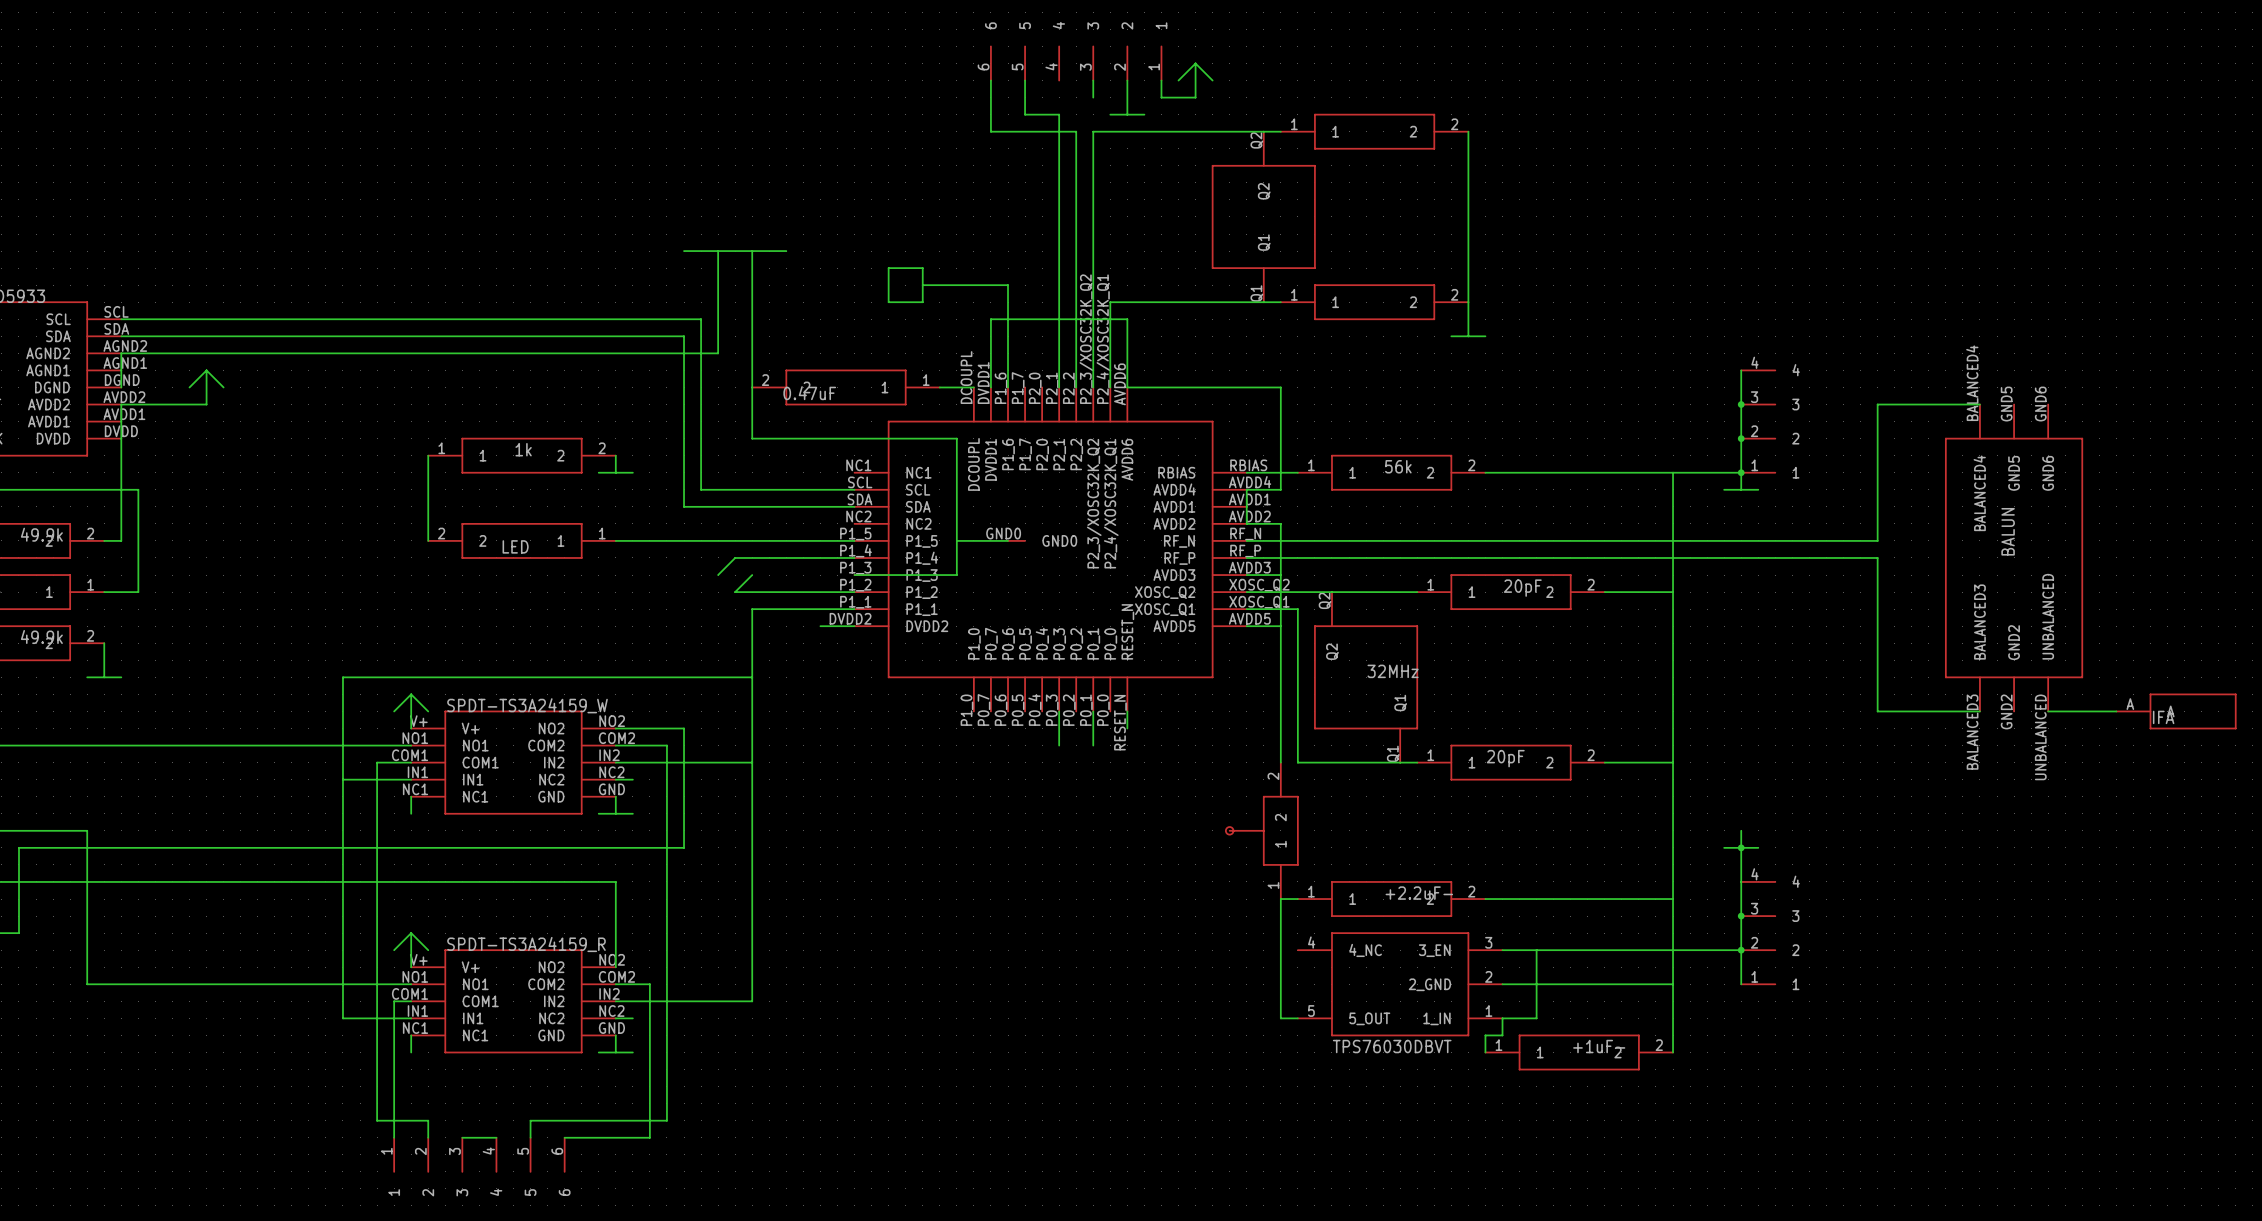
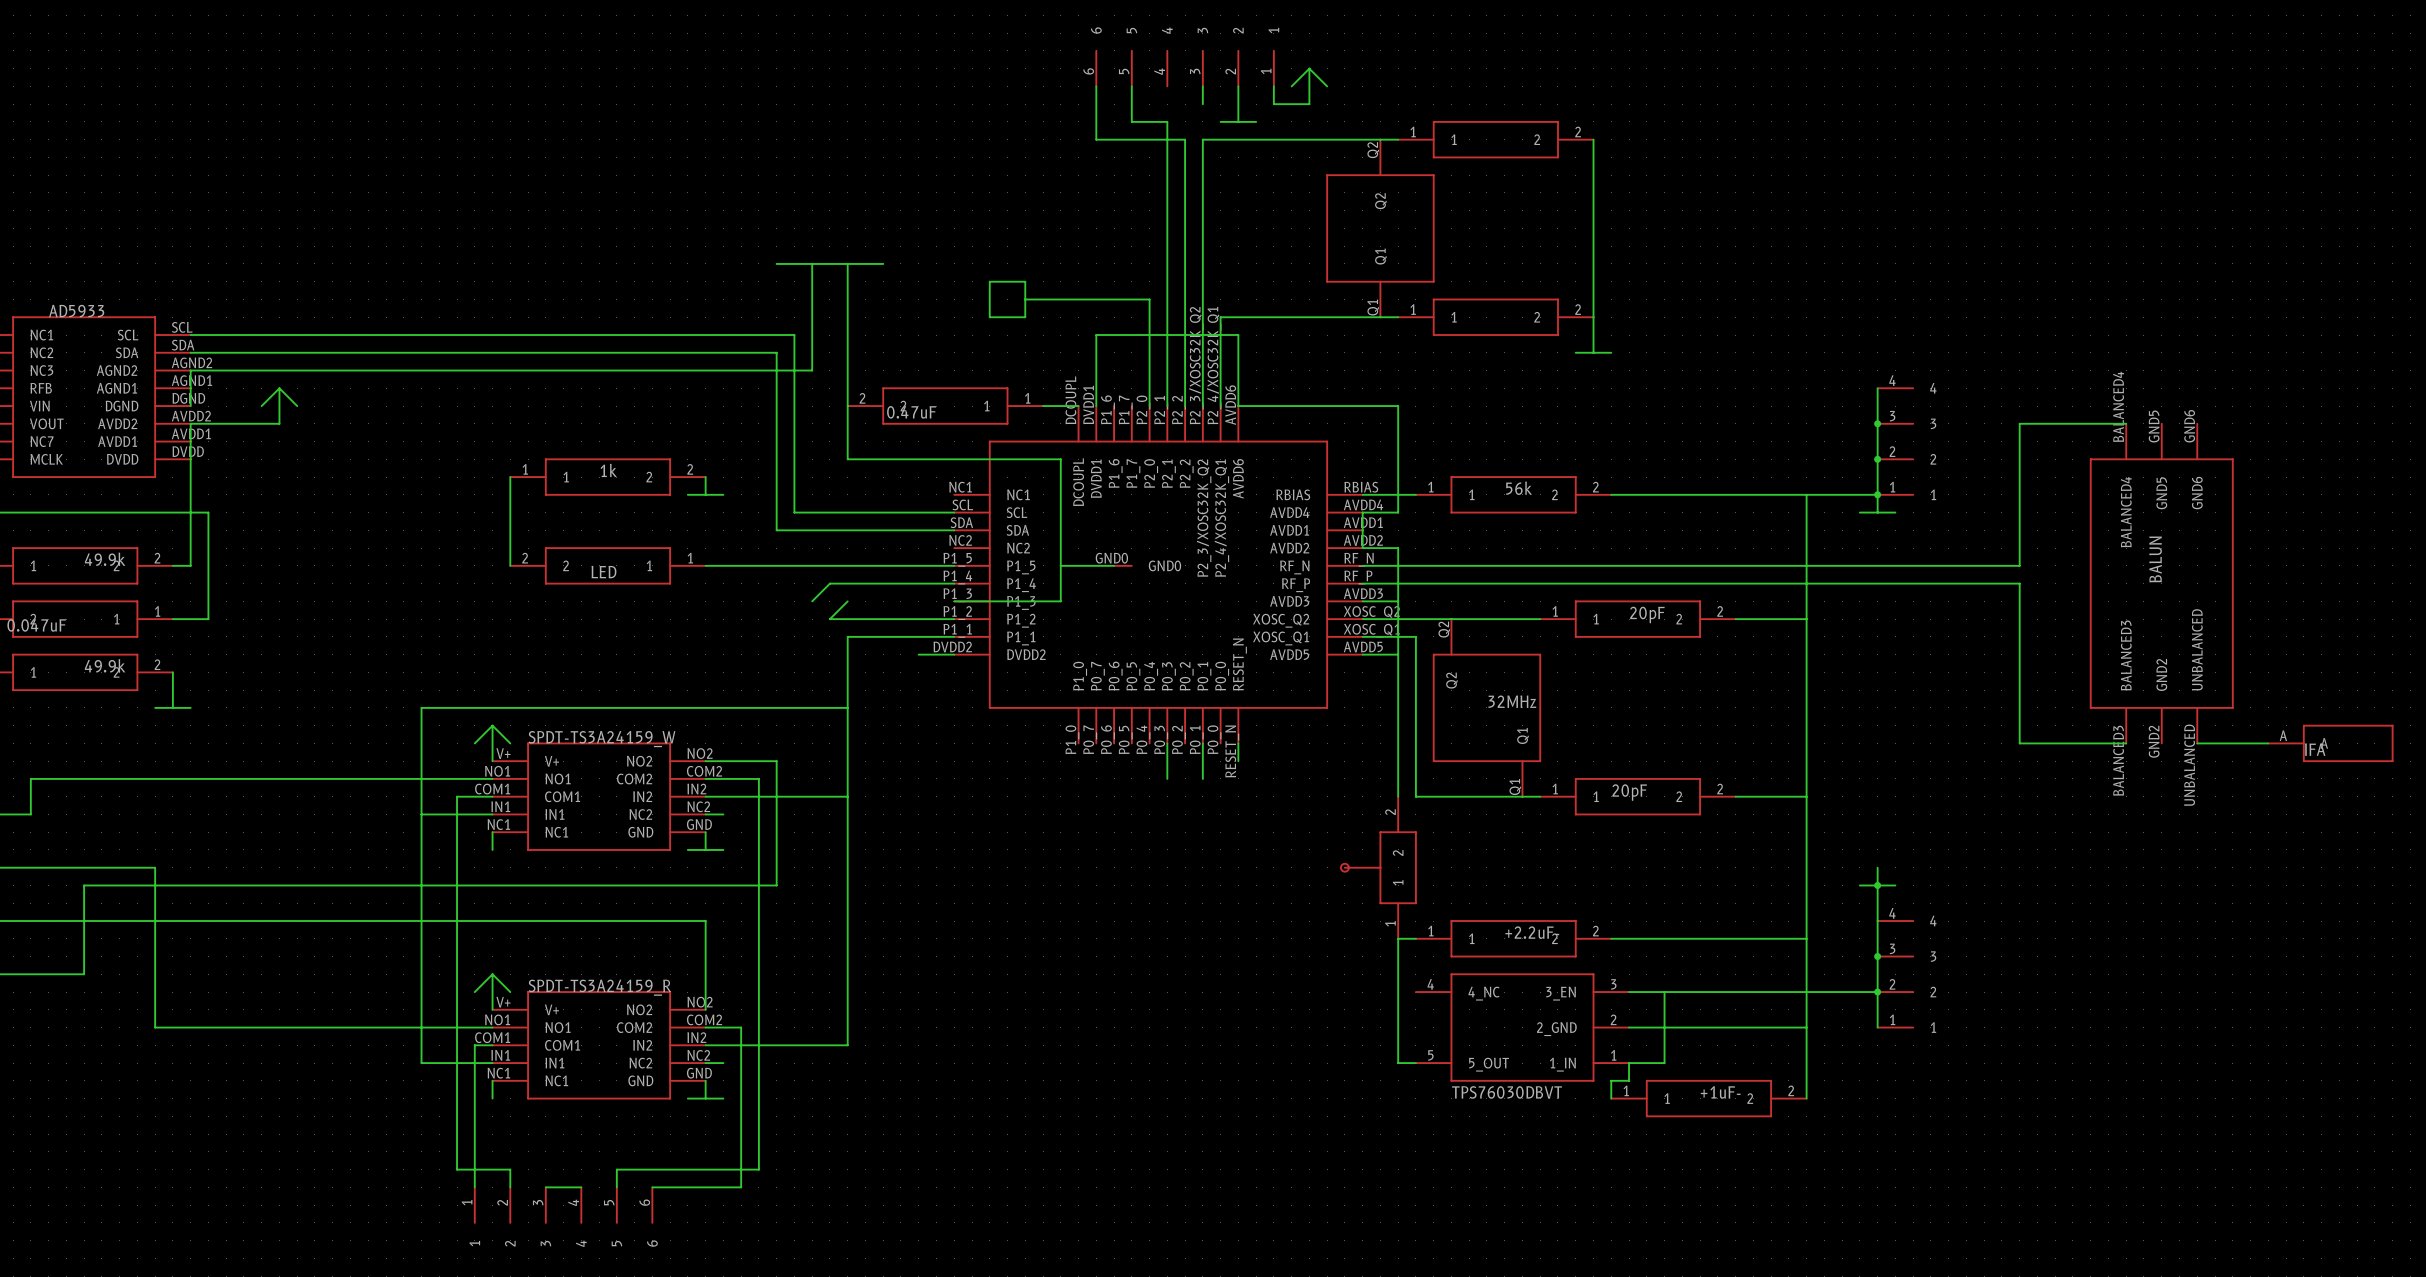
wire: (1008, 285) (1008, 387) -> (1114, 299) (1149, 299) (1149, 406)

